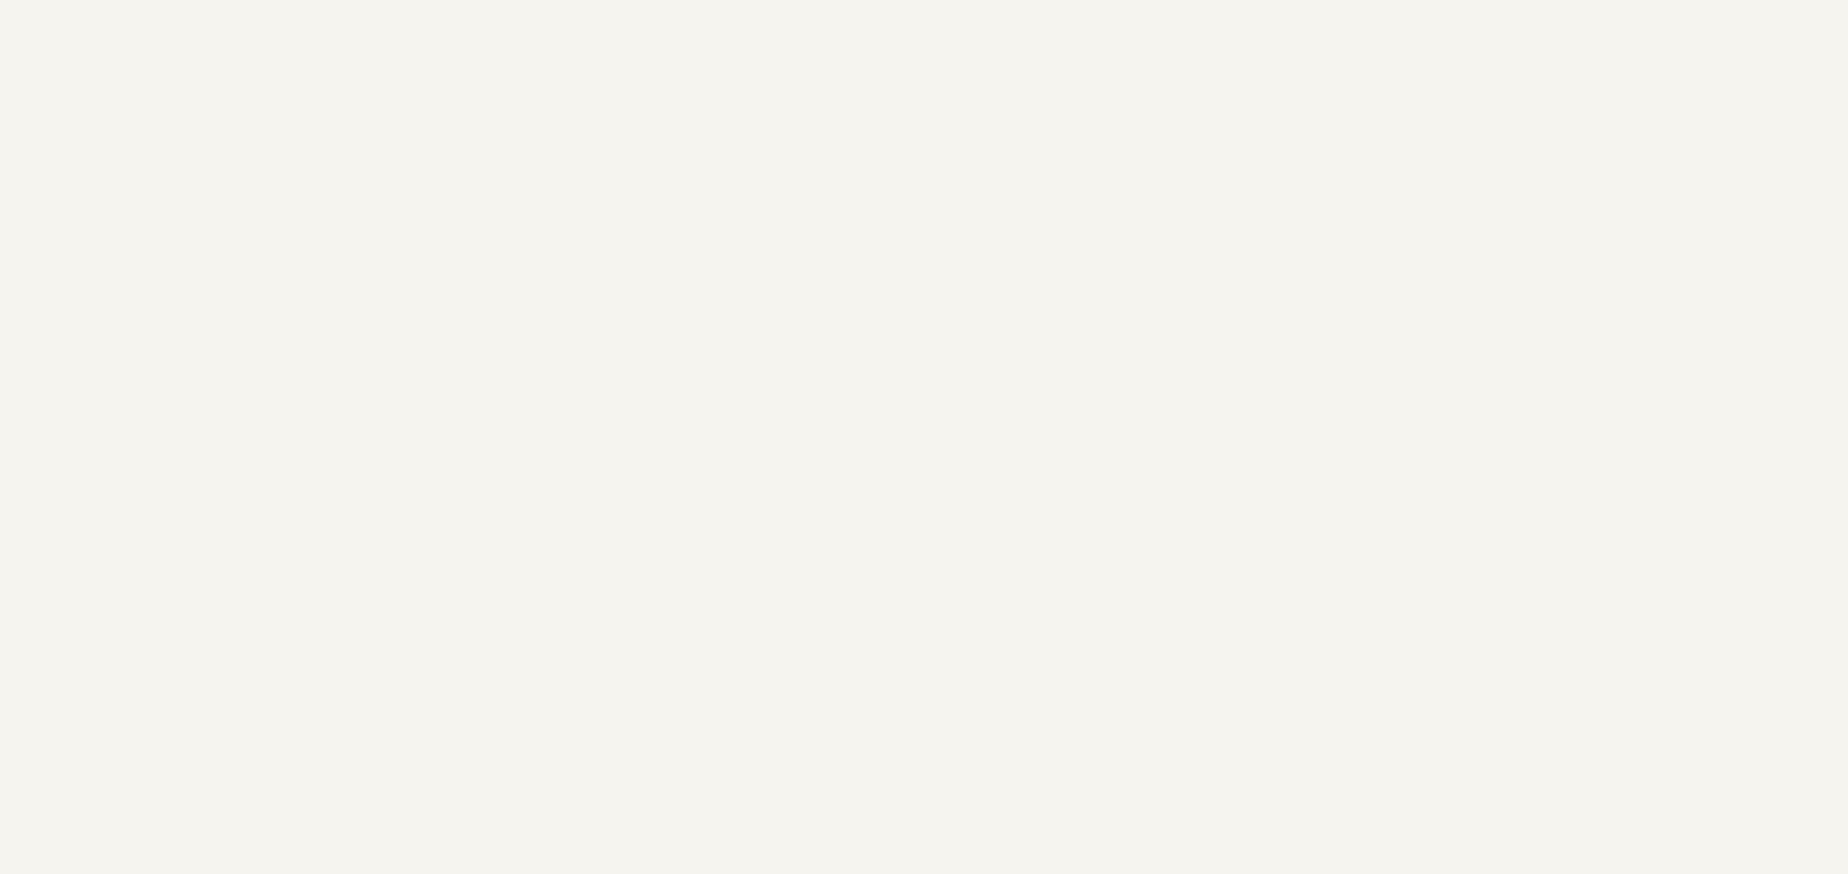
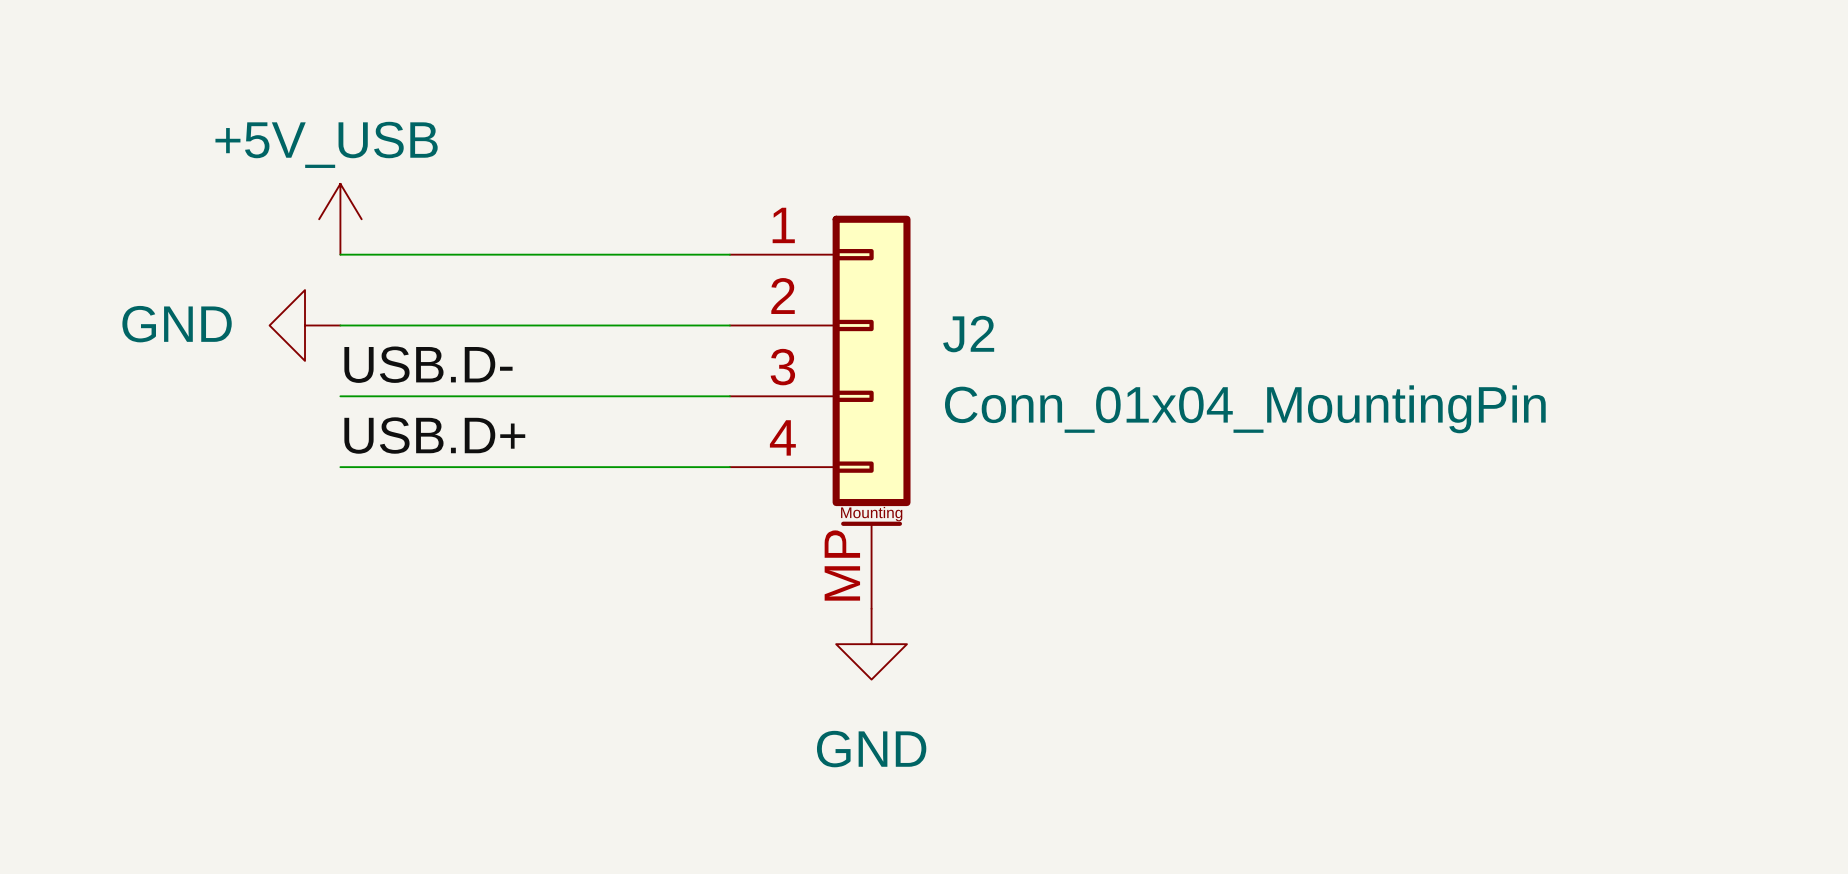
power symbol: none -> +5V_USB (340, 219)
wire: none -> (340, 254) (729, 254)
power symbol: none -> GND (305, 325)
wire: none -> (340, 325) (729, 325)
label: none -> USB.D- (428, 364)
wire: none -> (340, 396) (729, 396)
J2: none -> Conn_01x04_MountingPin (820, 412)
label: none -> USB.D+ (434, 435)
wire: none -> (340, 467) (729, 467)
power symbol: none -> GND (871, 644)

